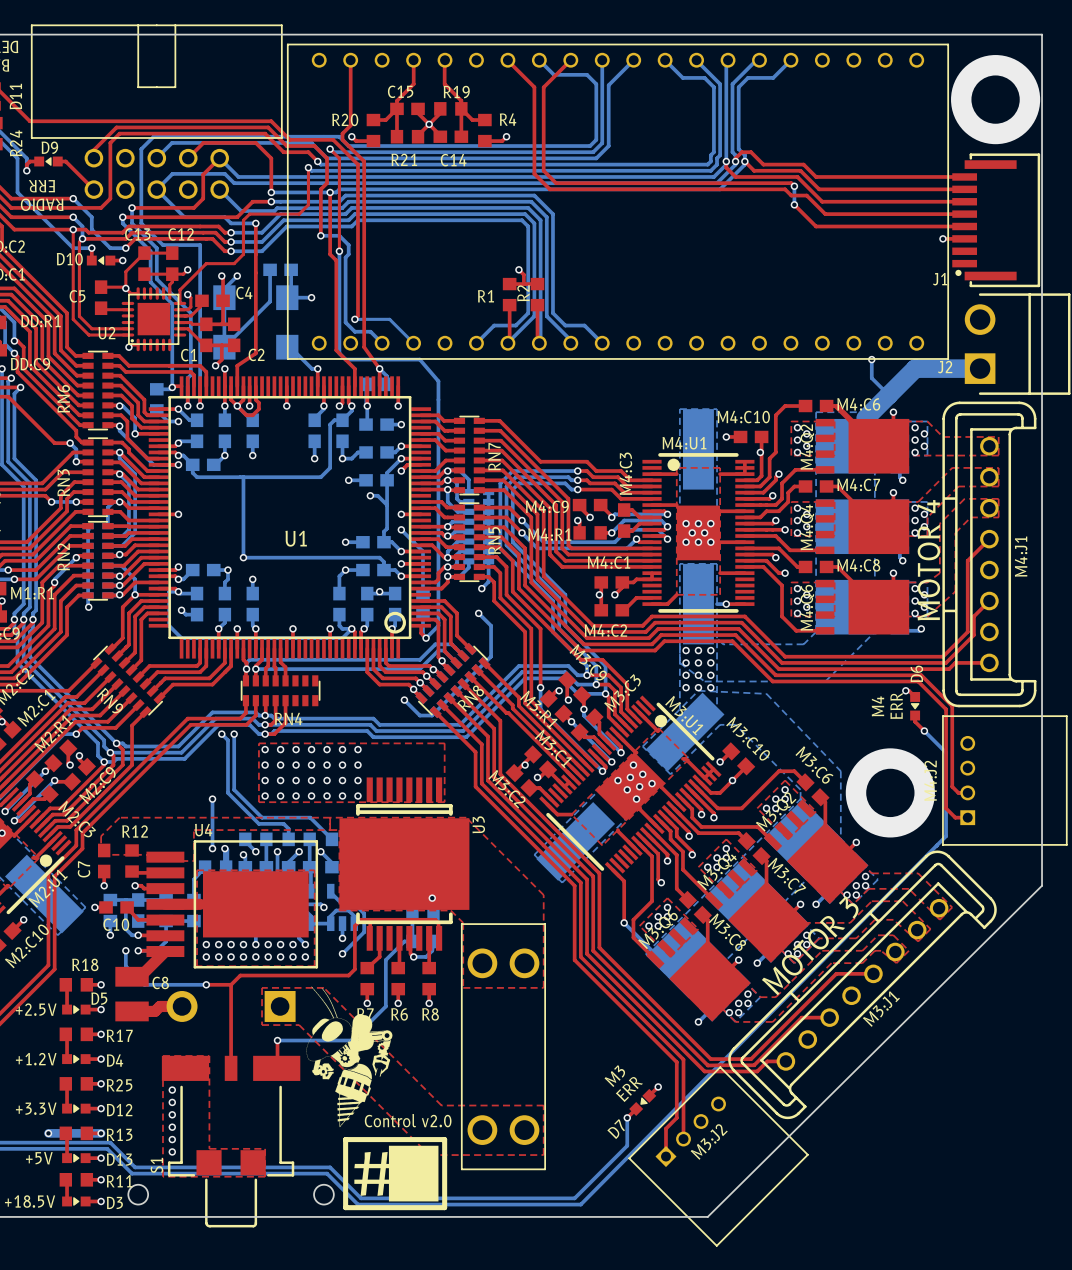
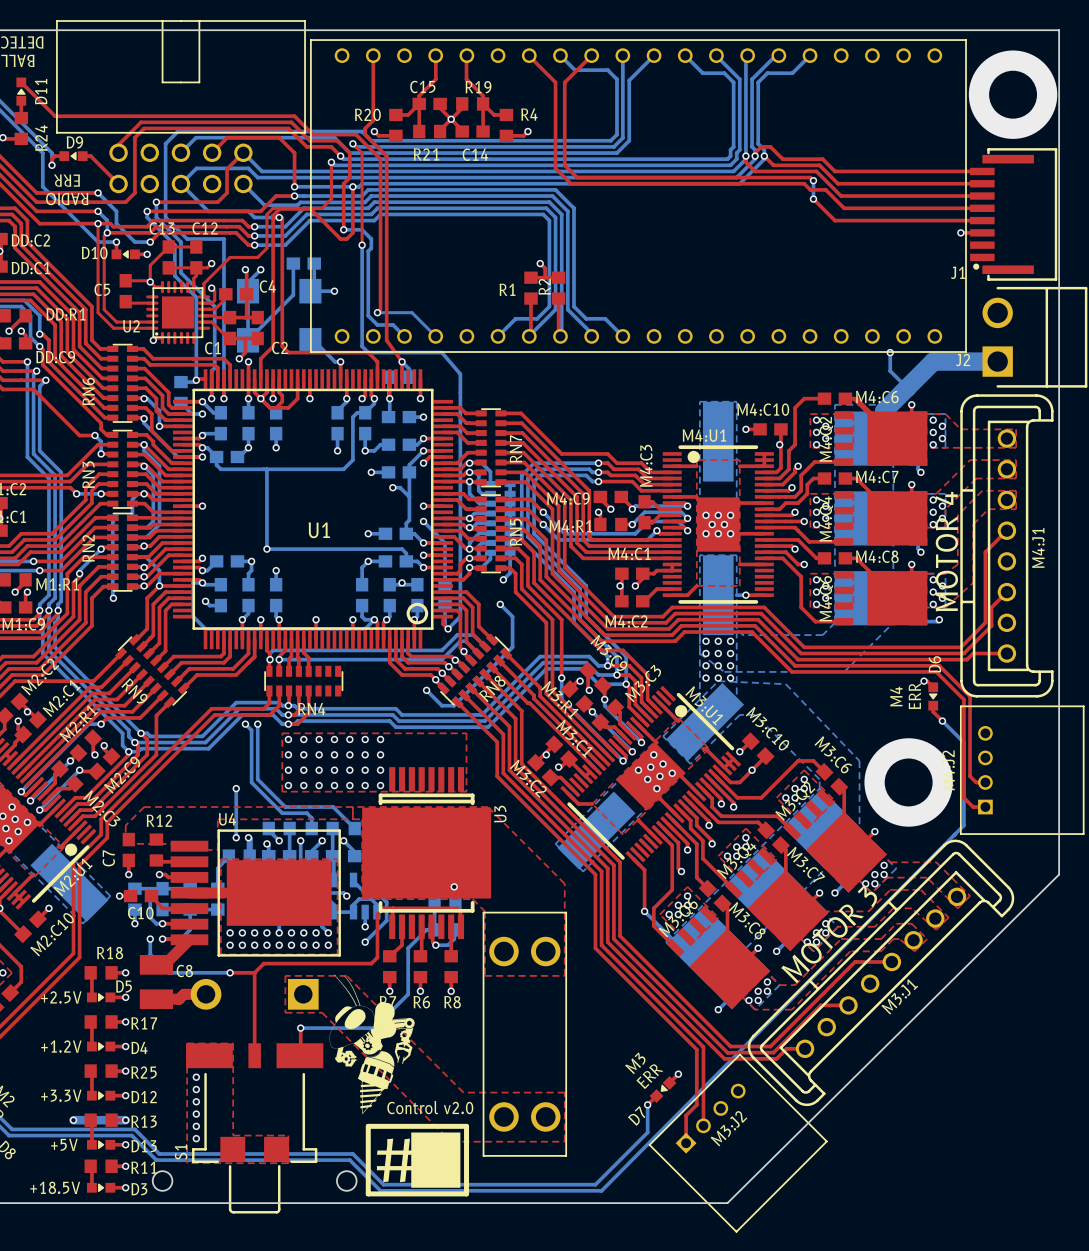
top track: (255, 223) (255, 353) (237, 365) -> (352, 232) (346, 239) (340, 239) (310, 208) (279, 208) (273, 215) (273, 346) (260, 358)
top track: (330, 238) (330, 254) (336, 260) (336, 350) (345, 359) -> (282, 217) (282, 346) (288, 352) (368, 352)
top track: none -> (297, 379) (297, 398) (288, 407) (276, 407)

